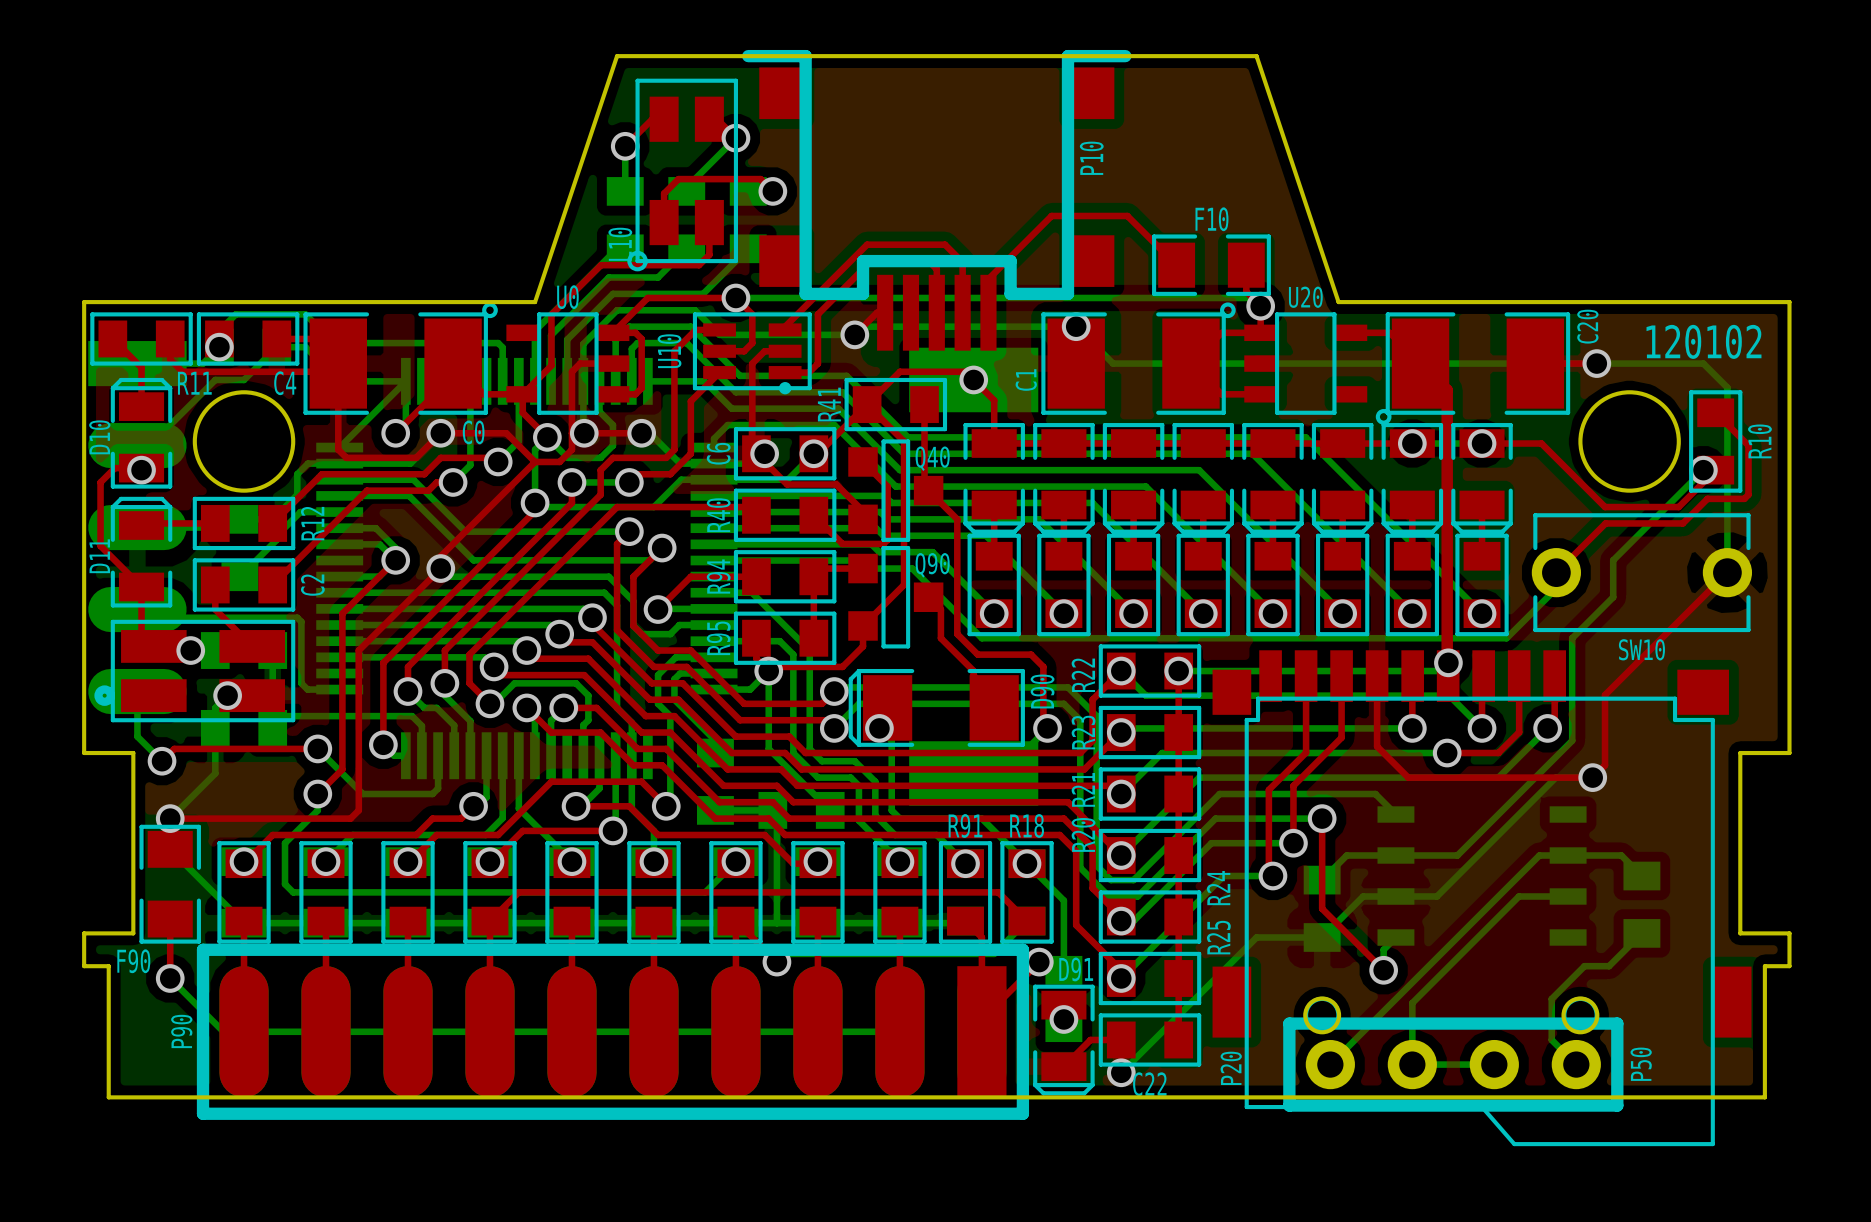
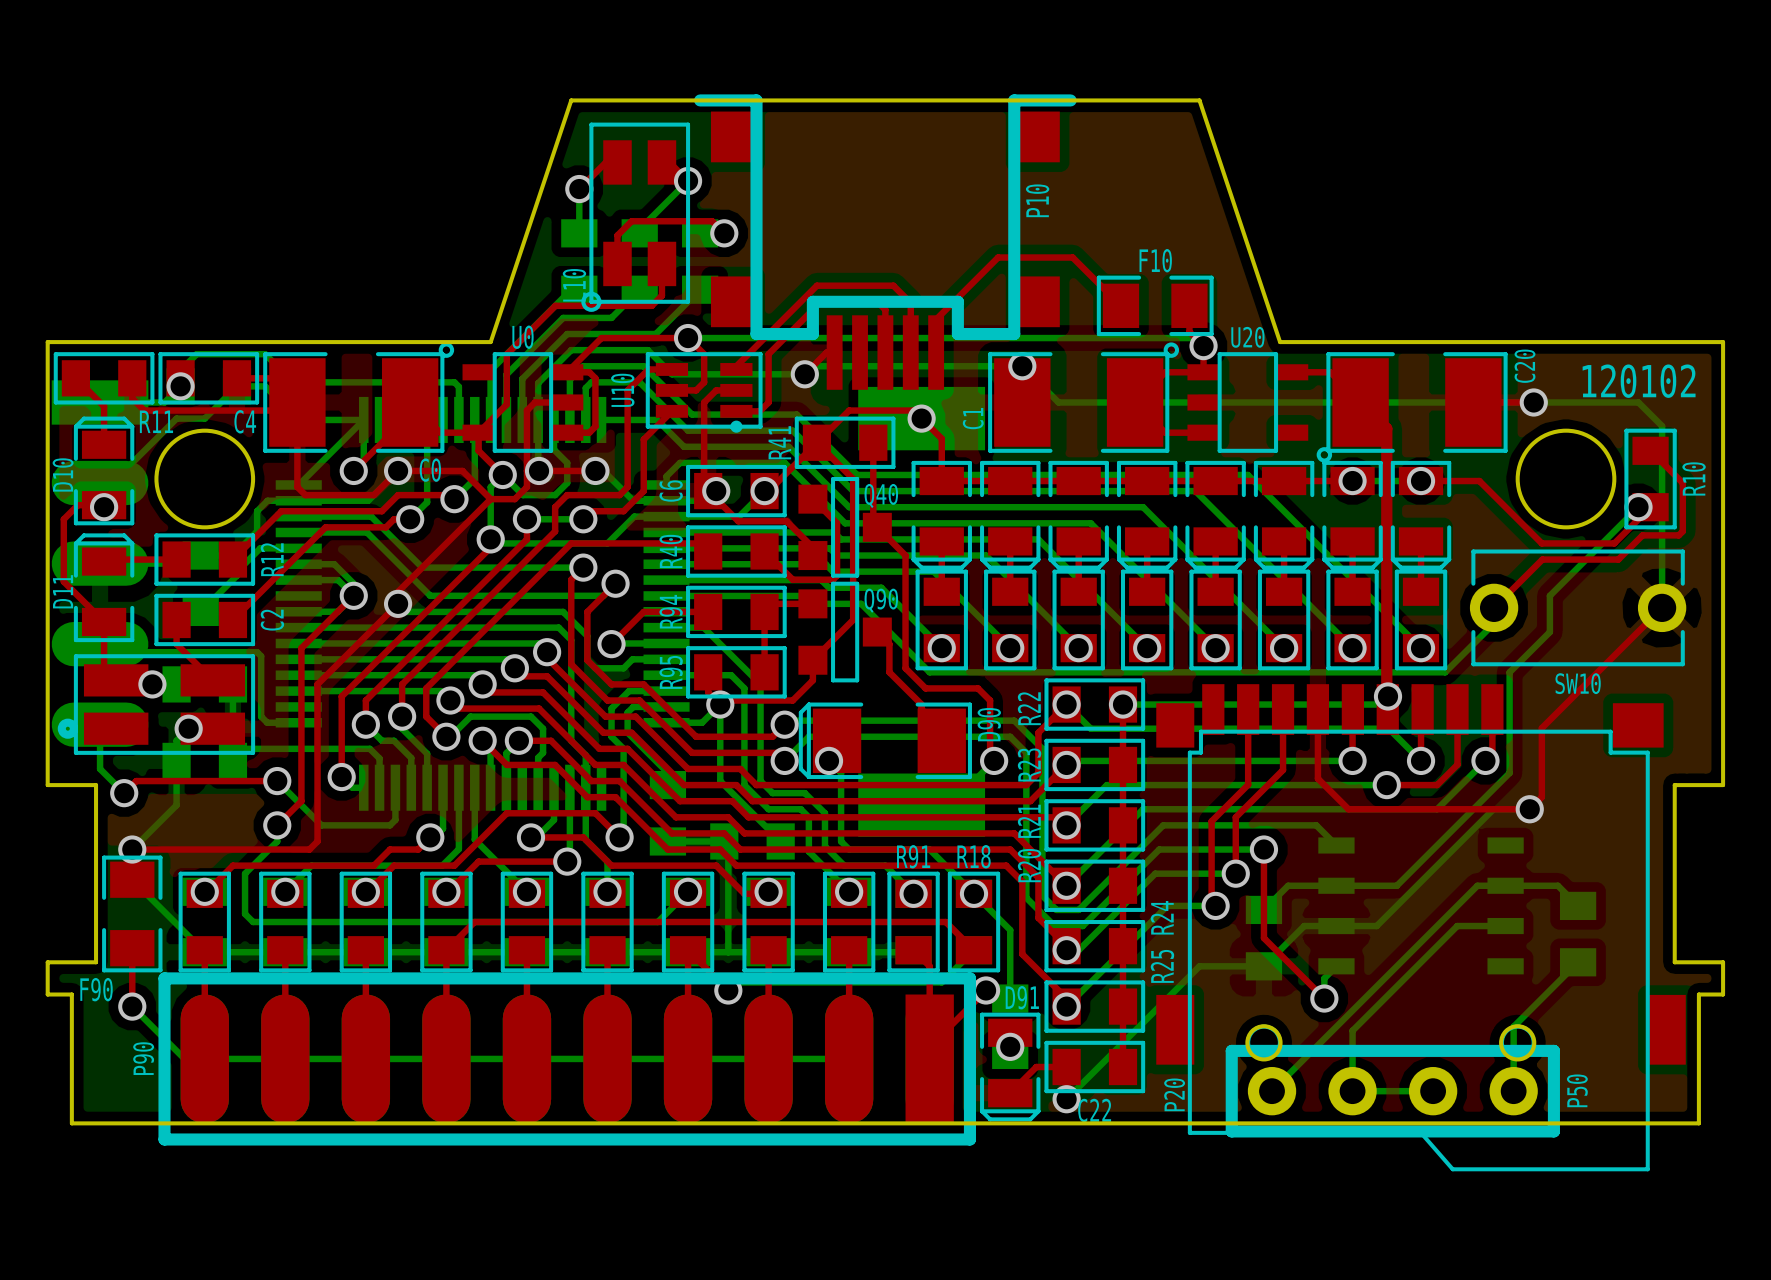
bottom track: (1609, 966) (1584, 966) (1551, 998) (1551, 1039) (1576, 1064) -> (1545, 994) (1513, 1026) (1513, 1091)

